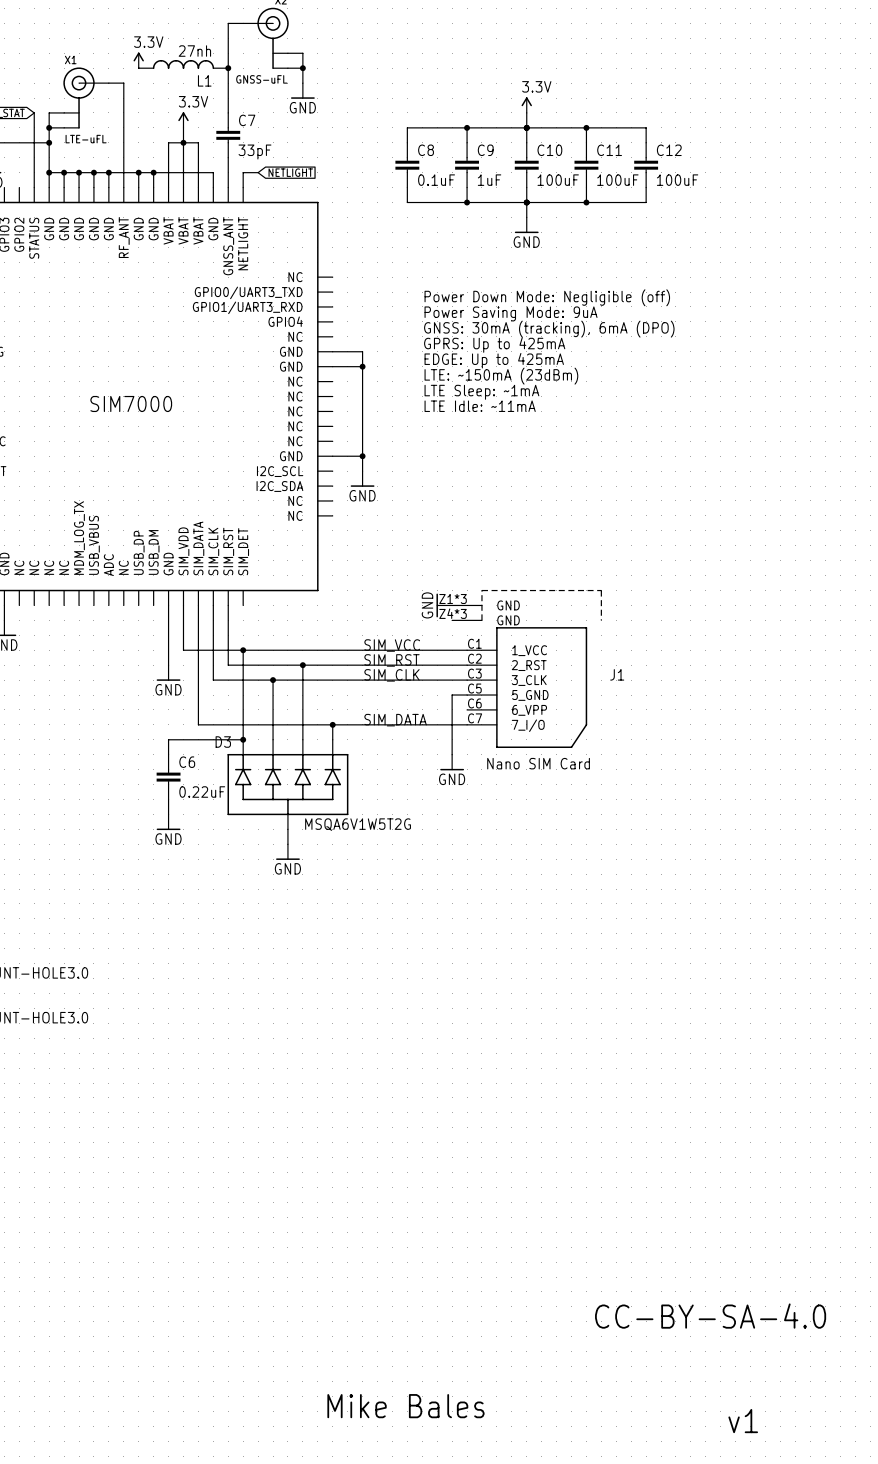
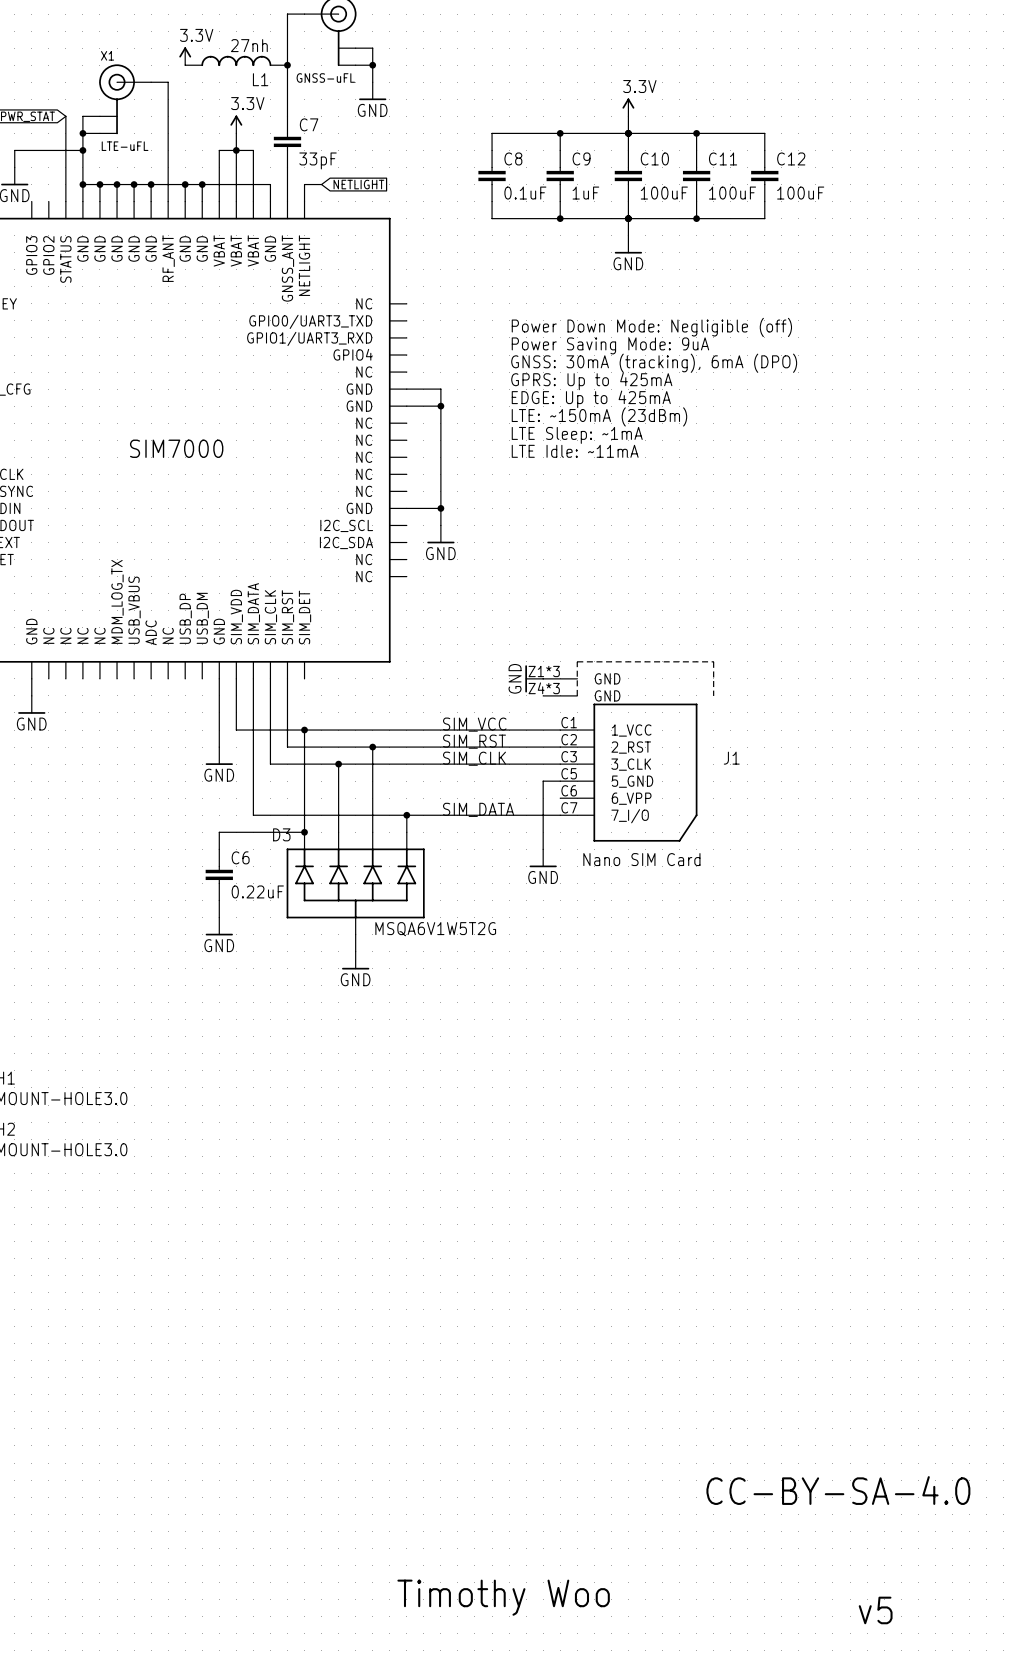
text: Mike Bales (405, 1406) -> Timothy Woo (503, 1597)
text: v1 (743, 1421) -> v5 (875, 1610)

